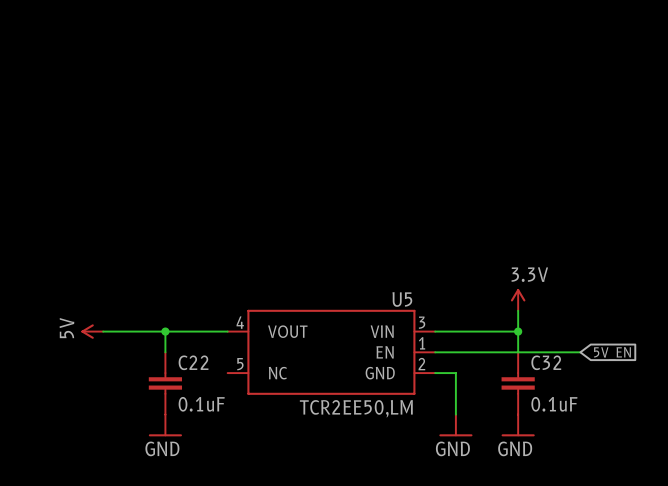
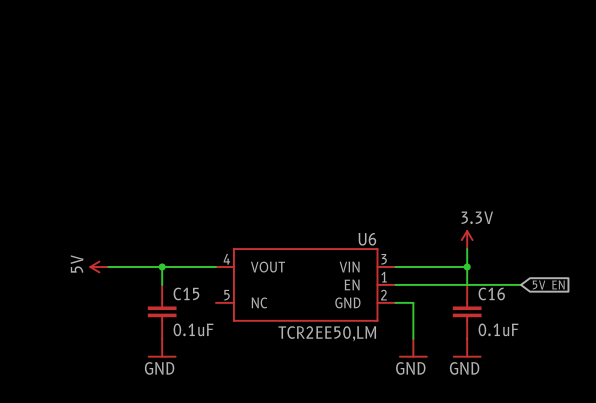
U5 name: U5 (402, 299) -> U6 (367, 239)
C22 name: C22 (193, 362) -> C15 (186, 293)
C32 name: C32 (546, 362) -> C16 (491, 293)

